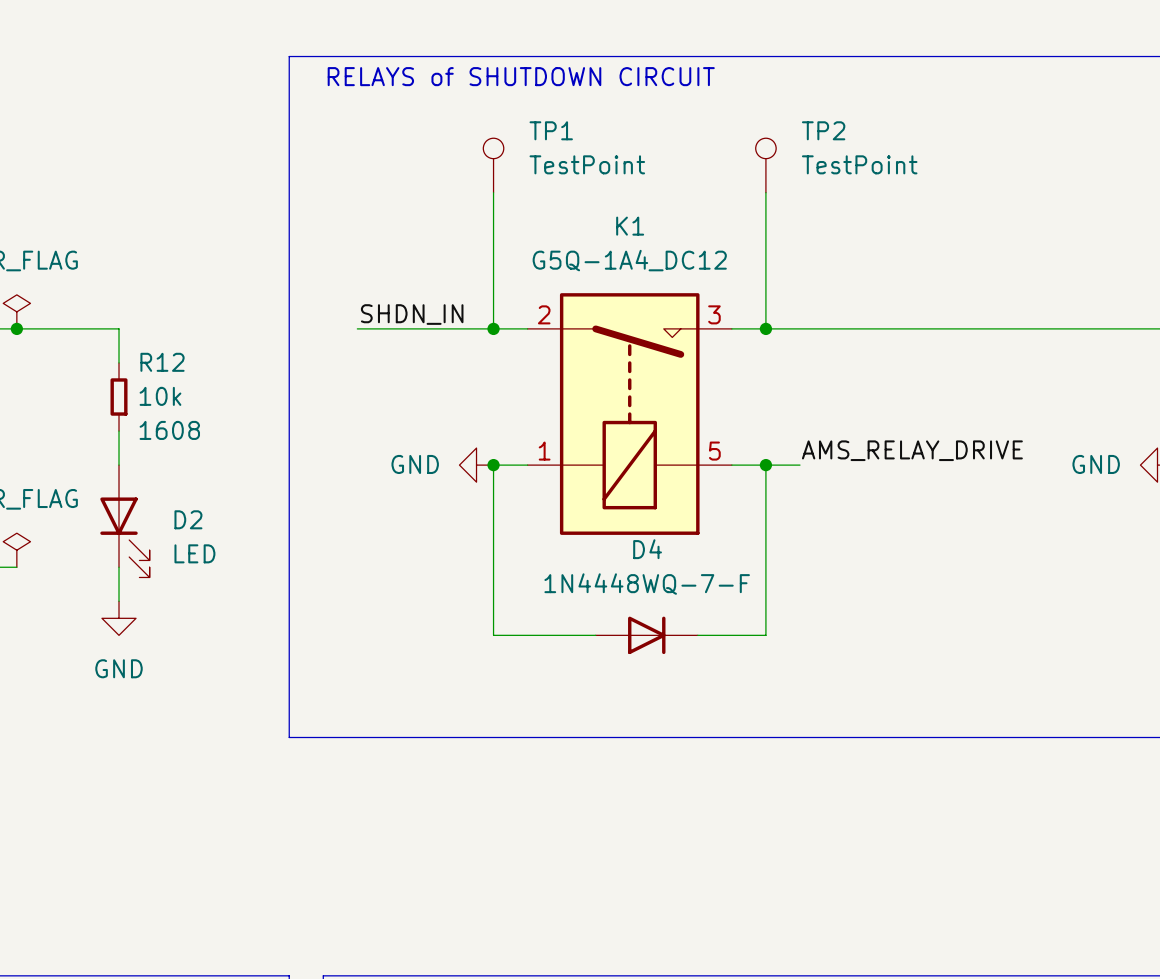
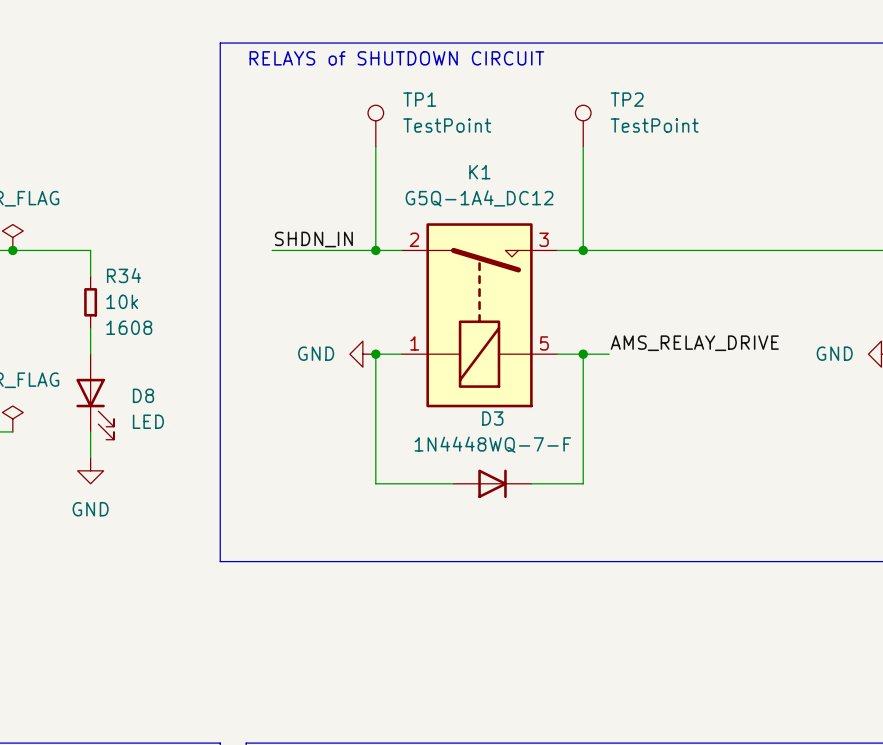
R12 name: R12 (162, 362) -> R34 (124, 275)
D2 name: D2 (188, 519) -> D8 (143, 395)
D4 name: D4 (647, 549) -> D3 (492, 418)

